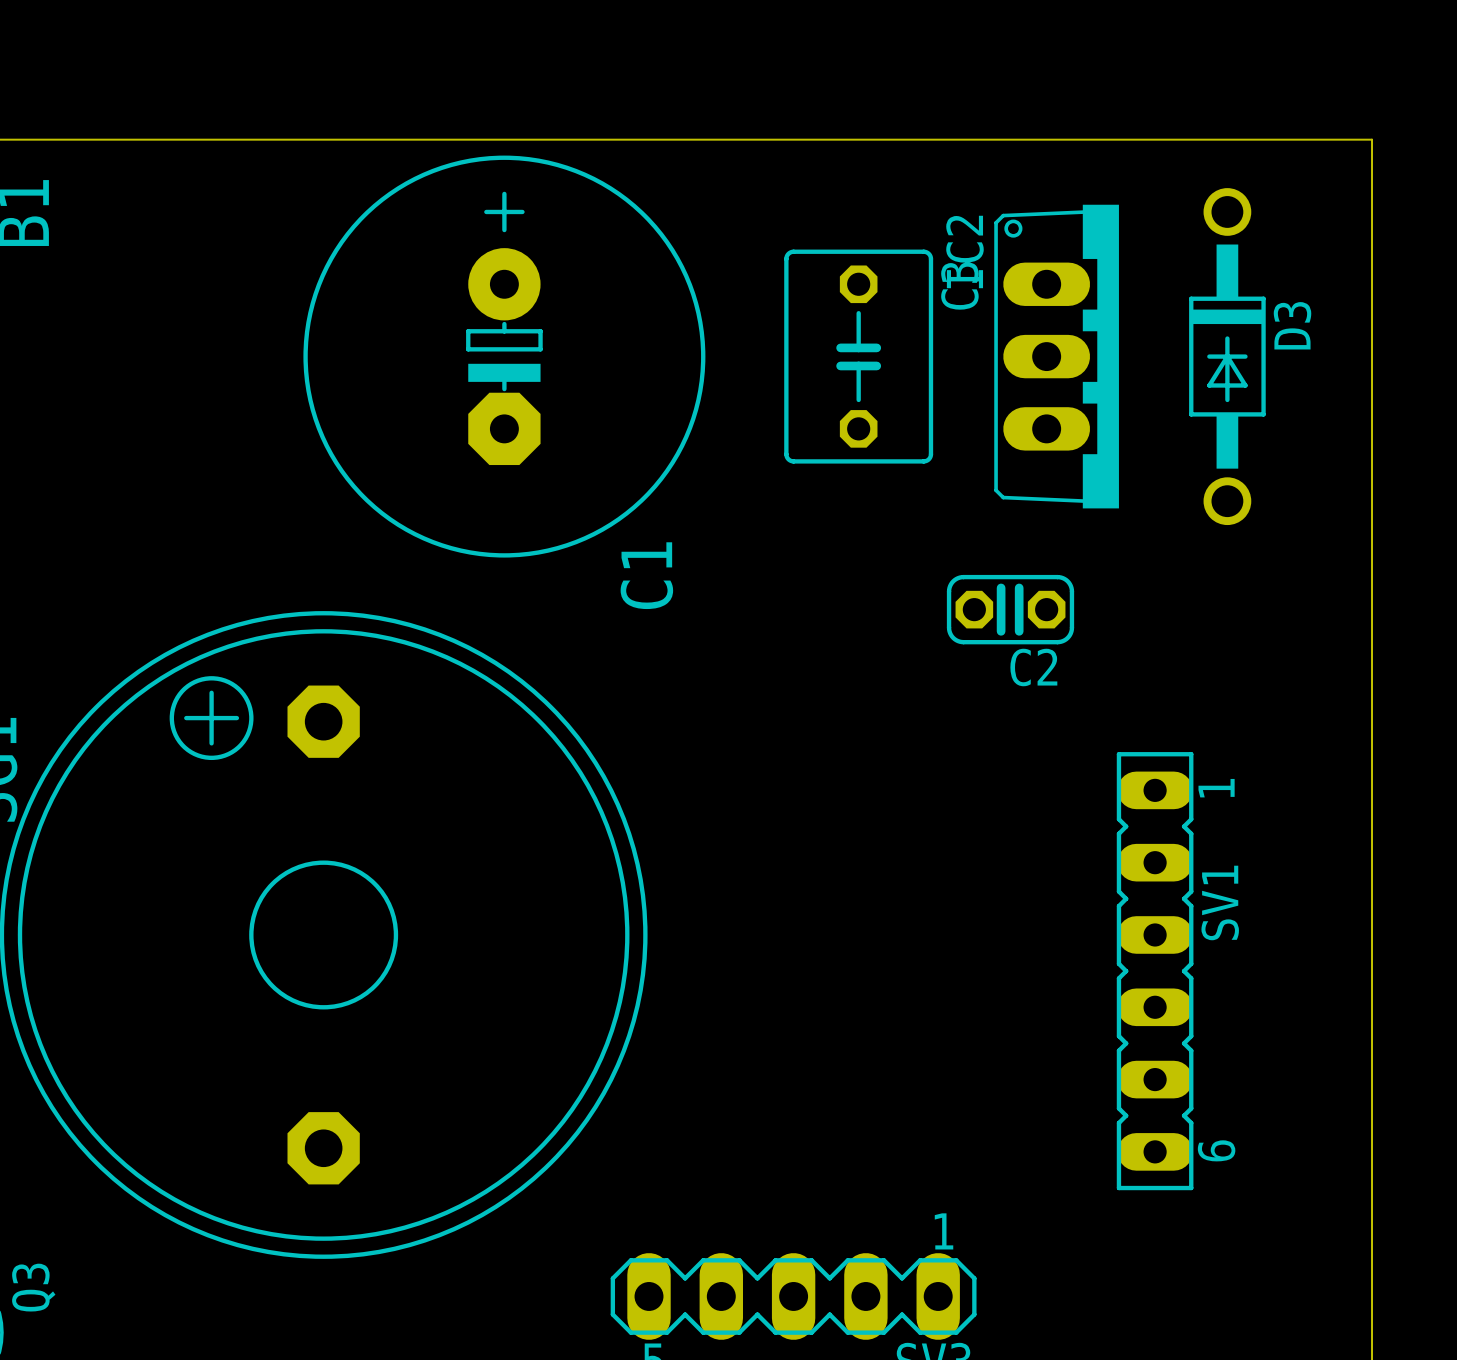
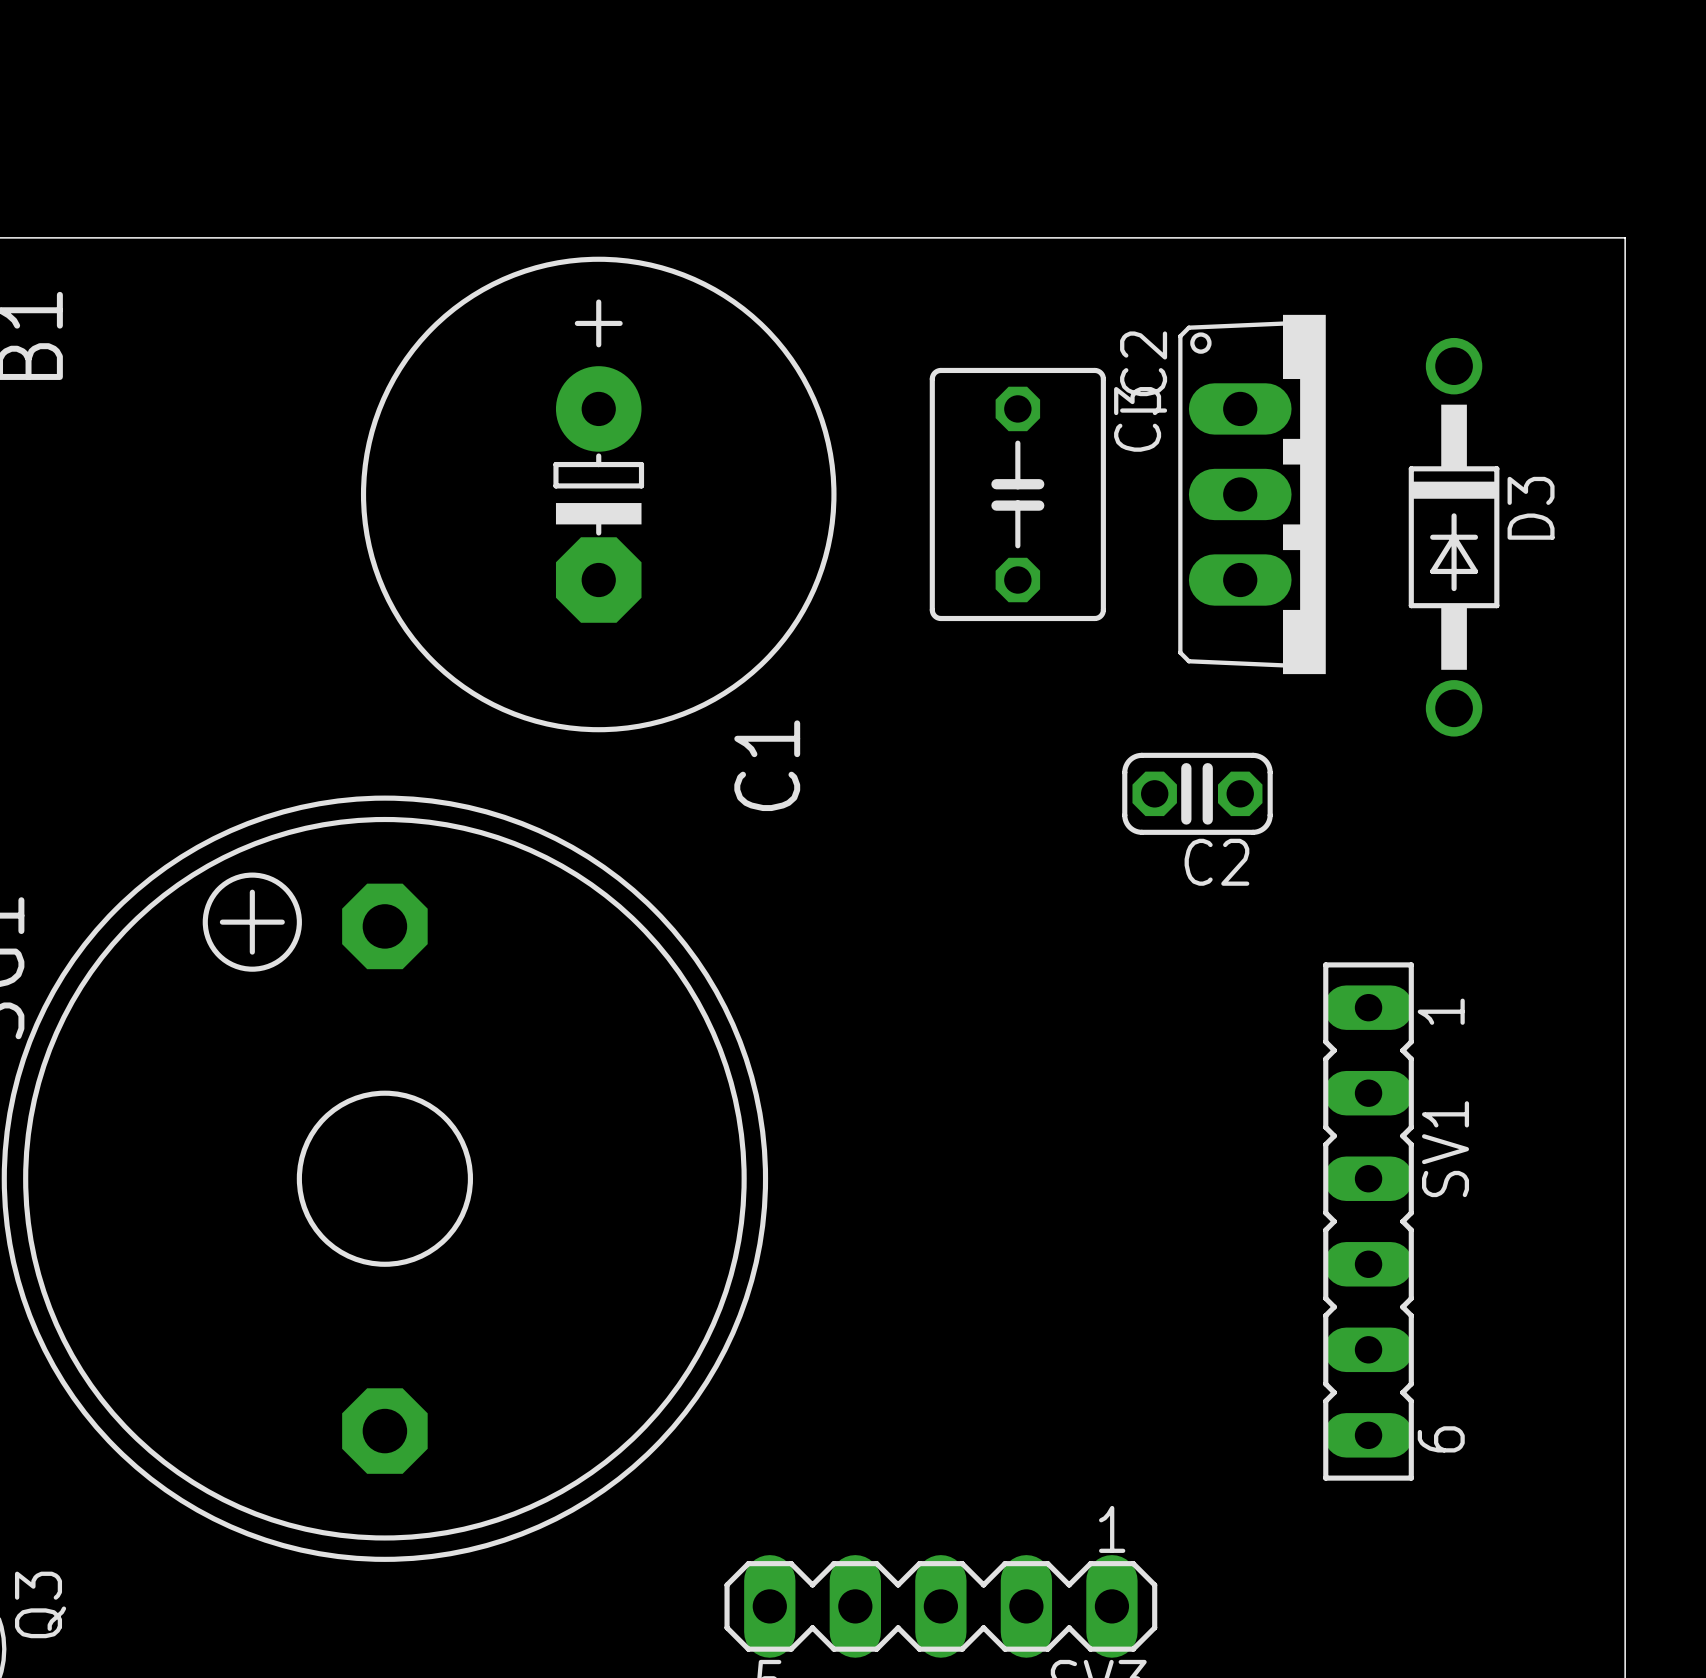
D3 position: (1227, 356) -> (1454, 537)

